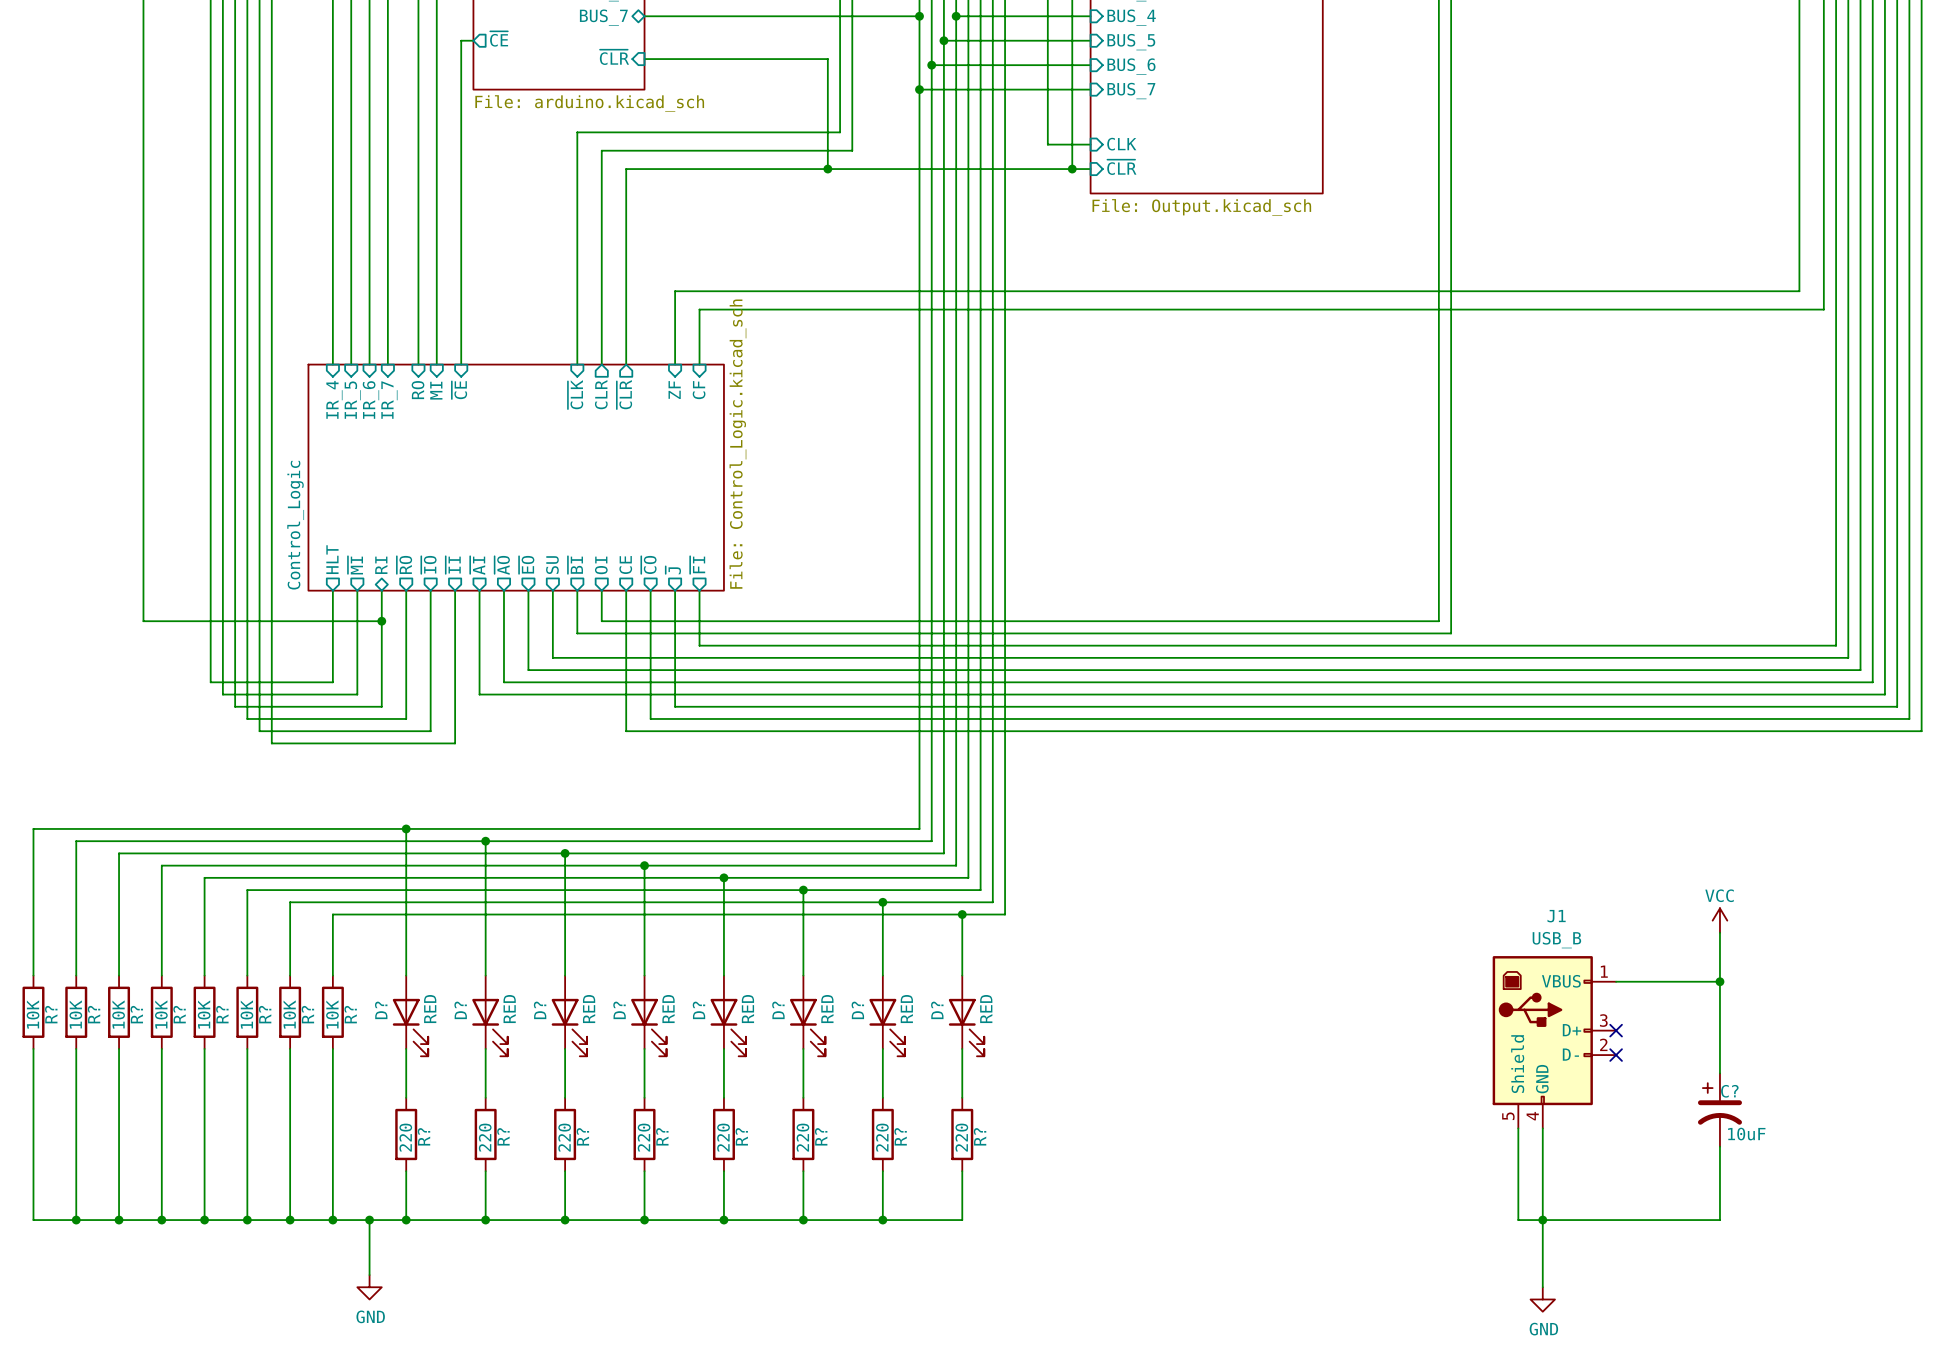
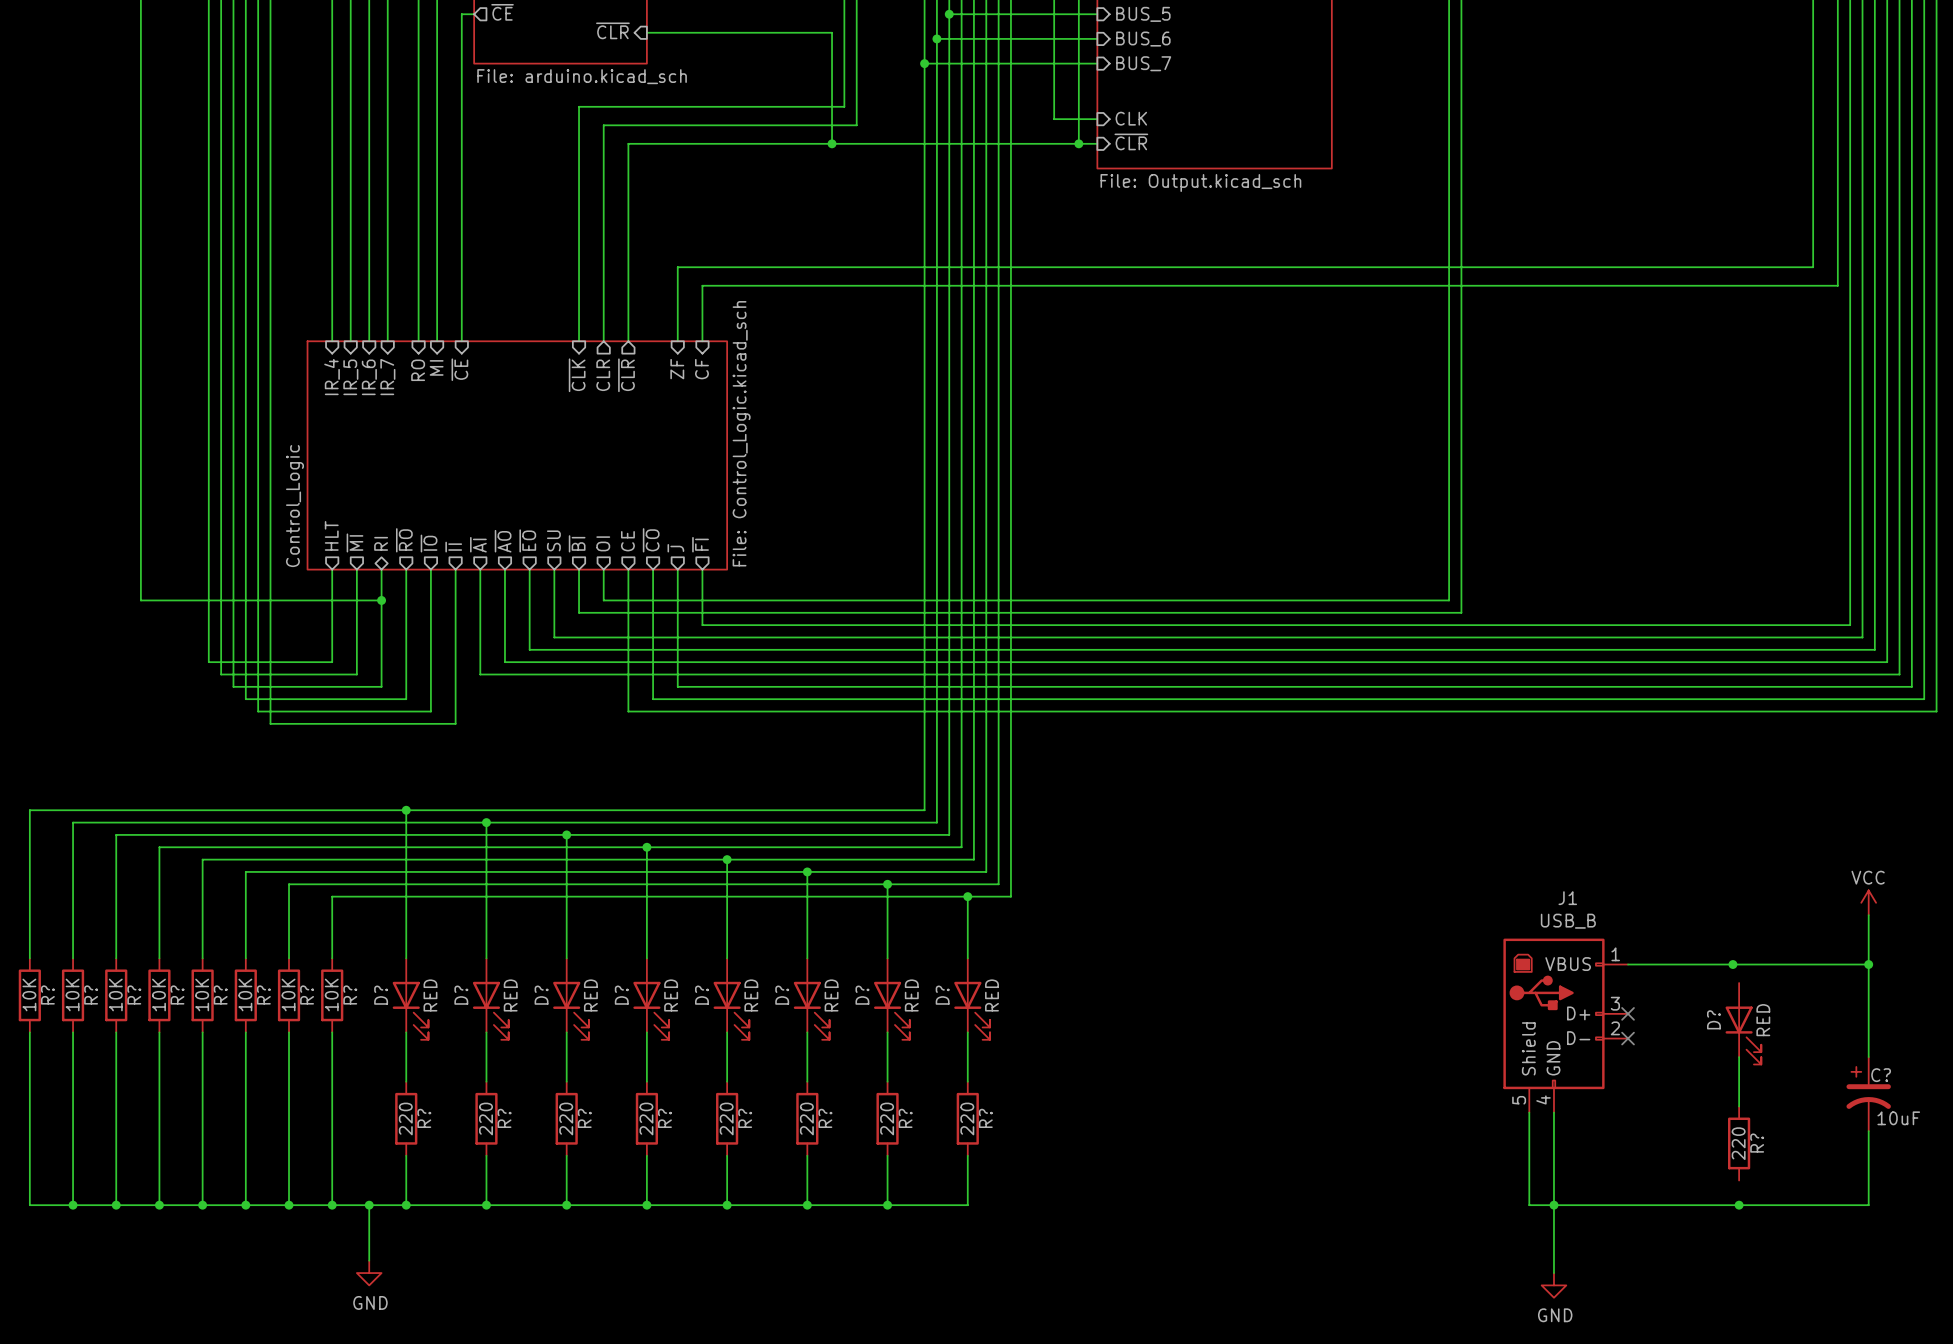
power symbol position: VCC (1719, 920) -> VCC (1868, 902)
wire: (1719, 932) (1719, 1073) -> (1868, 915) (1868, 1057)
wire: none -> (1732, 964) (1868, 964)
junction: none -> (1868, 964)
D?: none -> RED (1743, 1023)
wire: none -> (1739, 1057) (1739, 1106)
C? position: (1719, 1110) -> (1868, 1094)
wire: (1719, 1146) (1719, 1220) -> (1868, 1131) (1868, 1205) (1732, 1205)
R?: none -> 220 (1739, 1143)
junction: none -> (1739, 1205)

